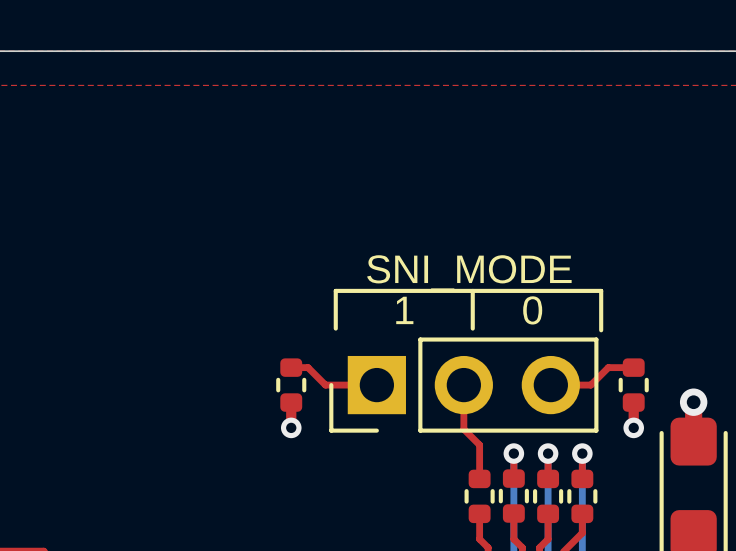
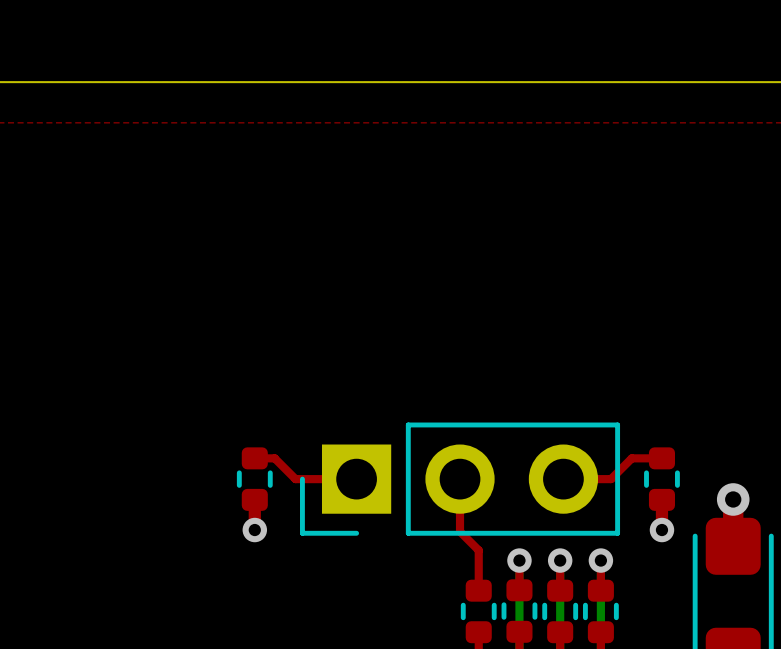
text: SNI_MODE (469, 273) -> none
line: (472, 290) (472, 328) -> none
text: 1 (404, 310) -> none
text: 0 (532, 310) -> none
line: (335, 328) (335, 290) (601, 290) (601, 330) -> none

